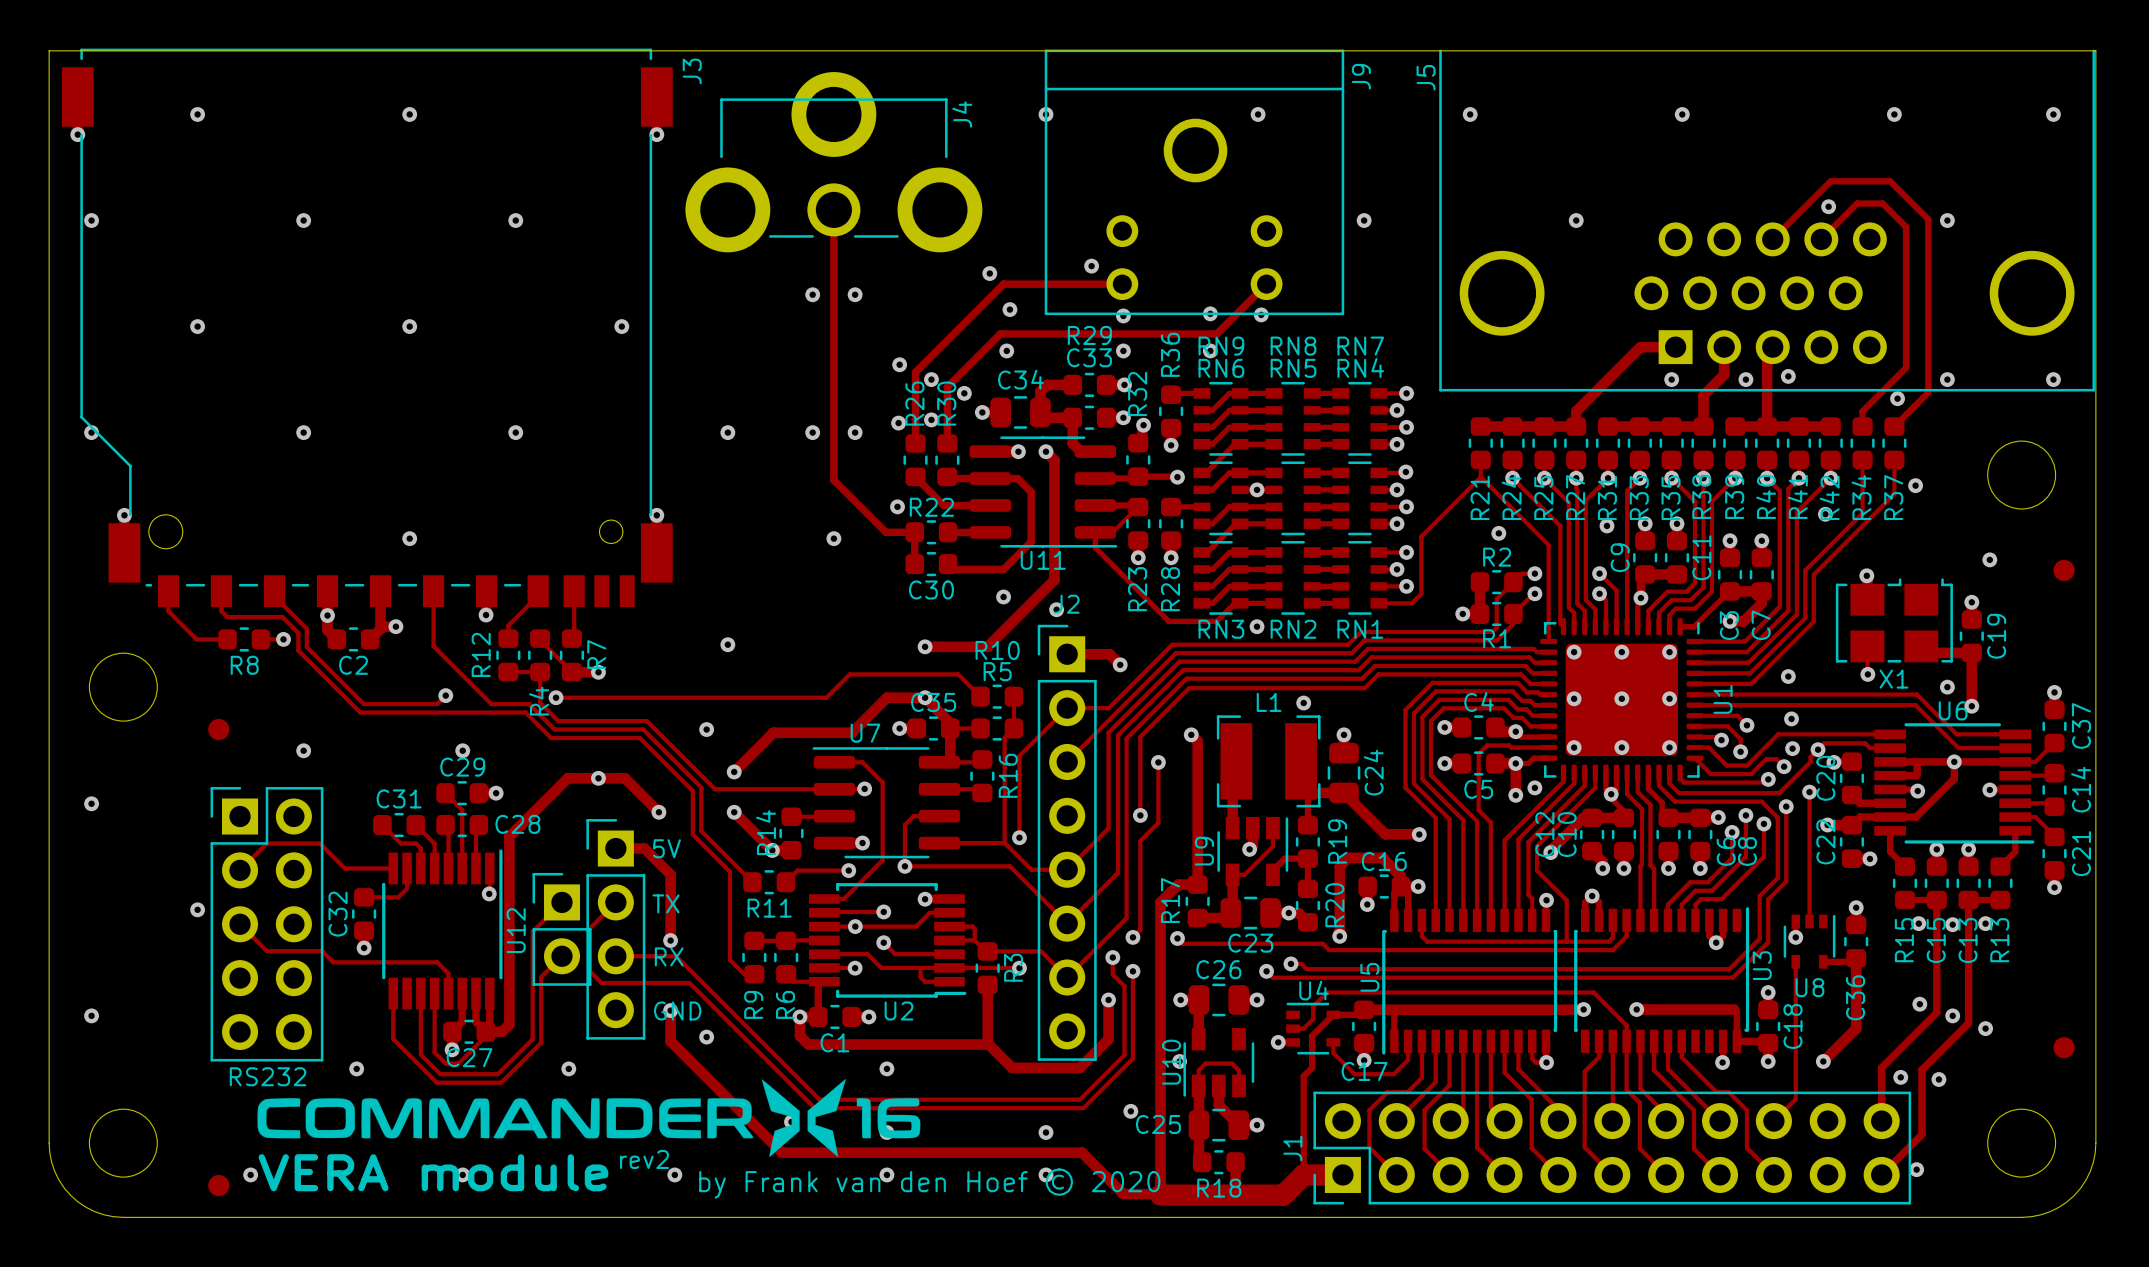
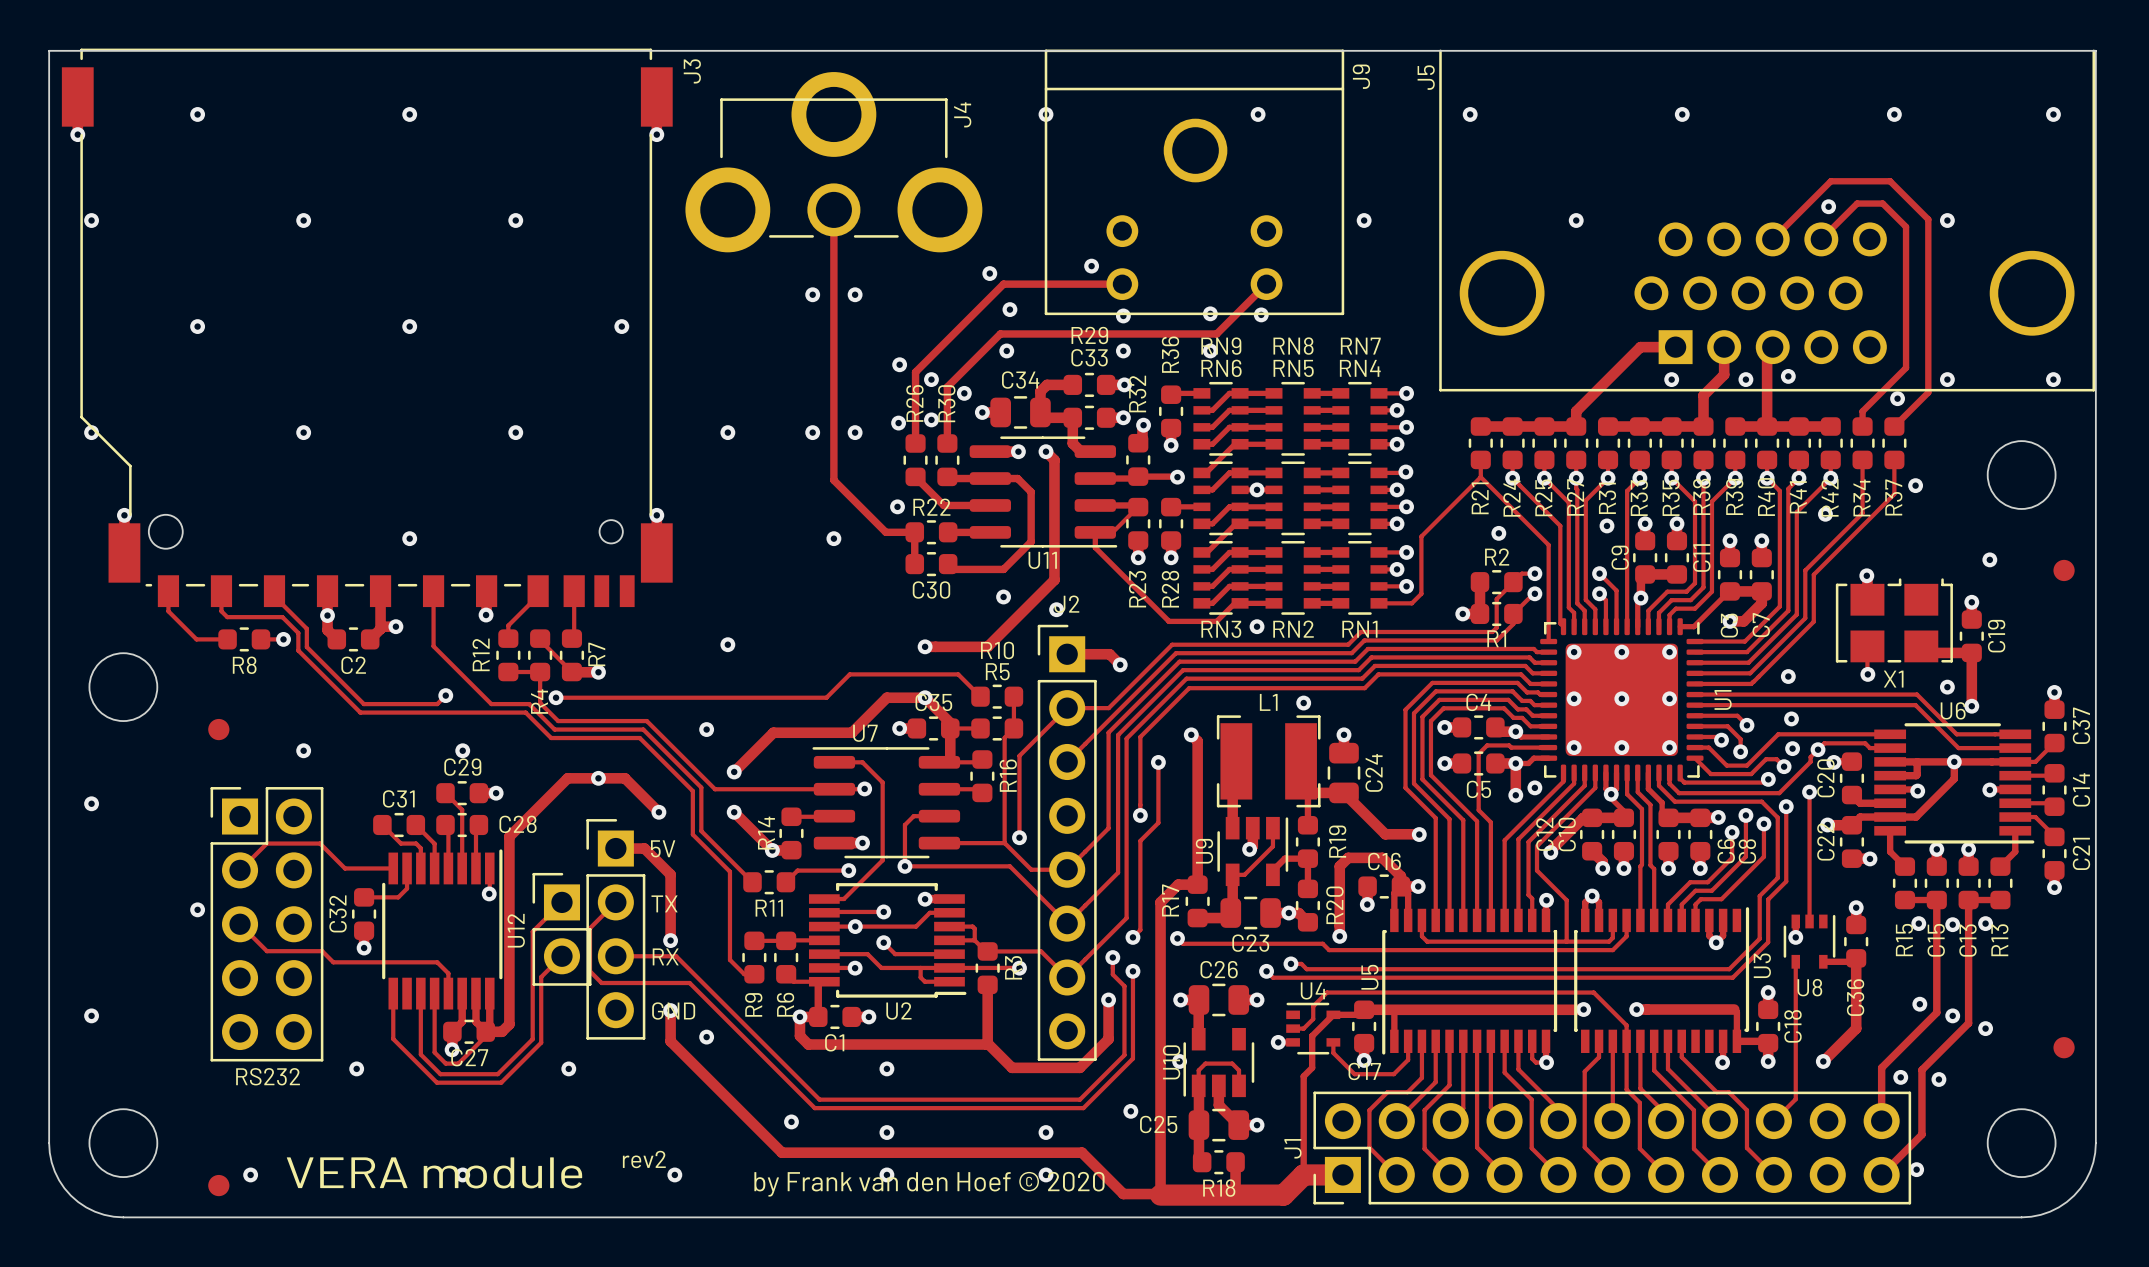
drawing: [257, 1078, 921, 1158] -> none

